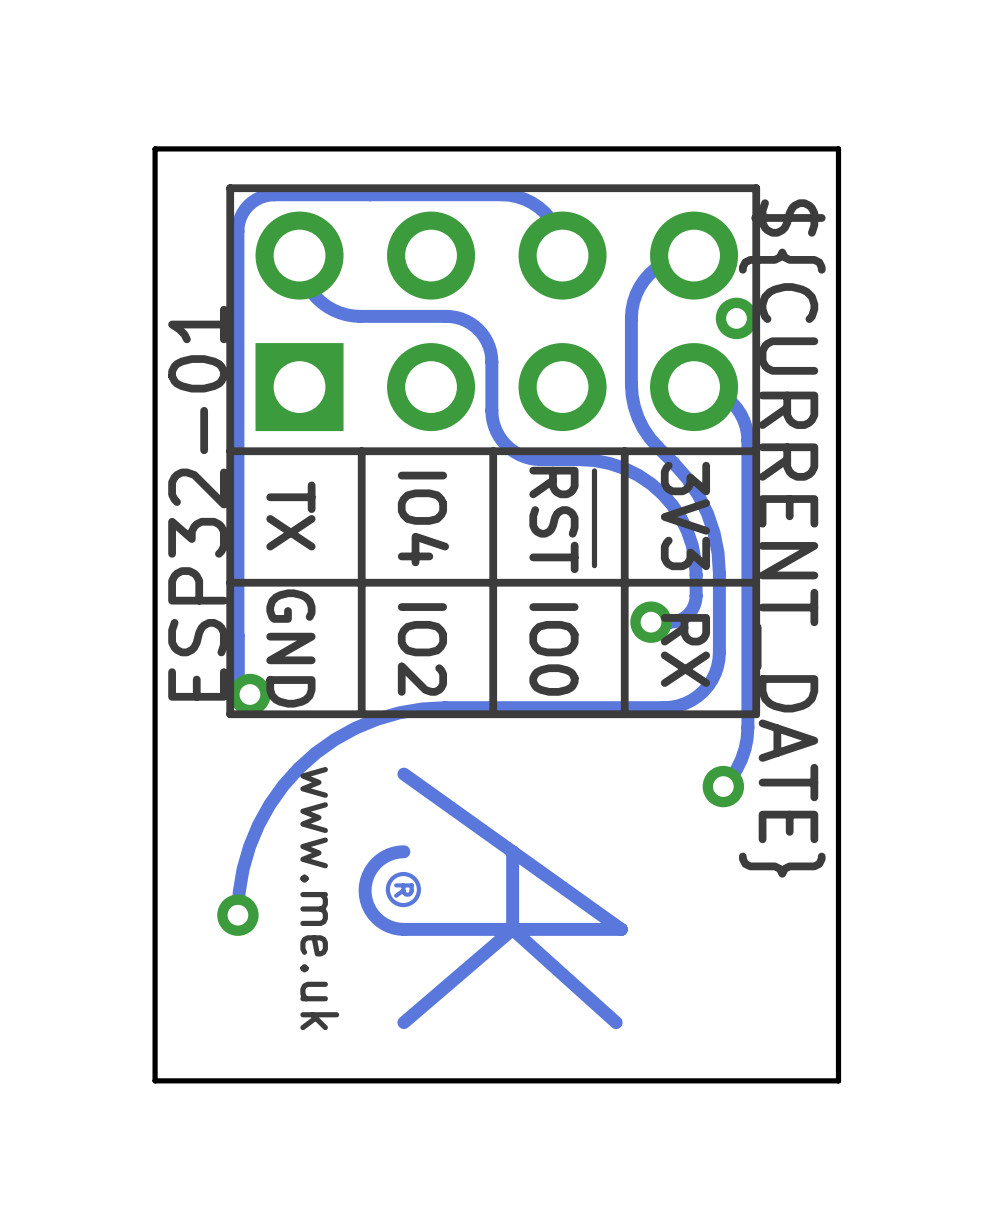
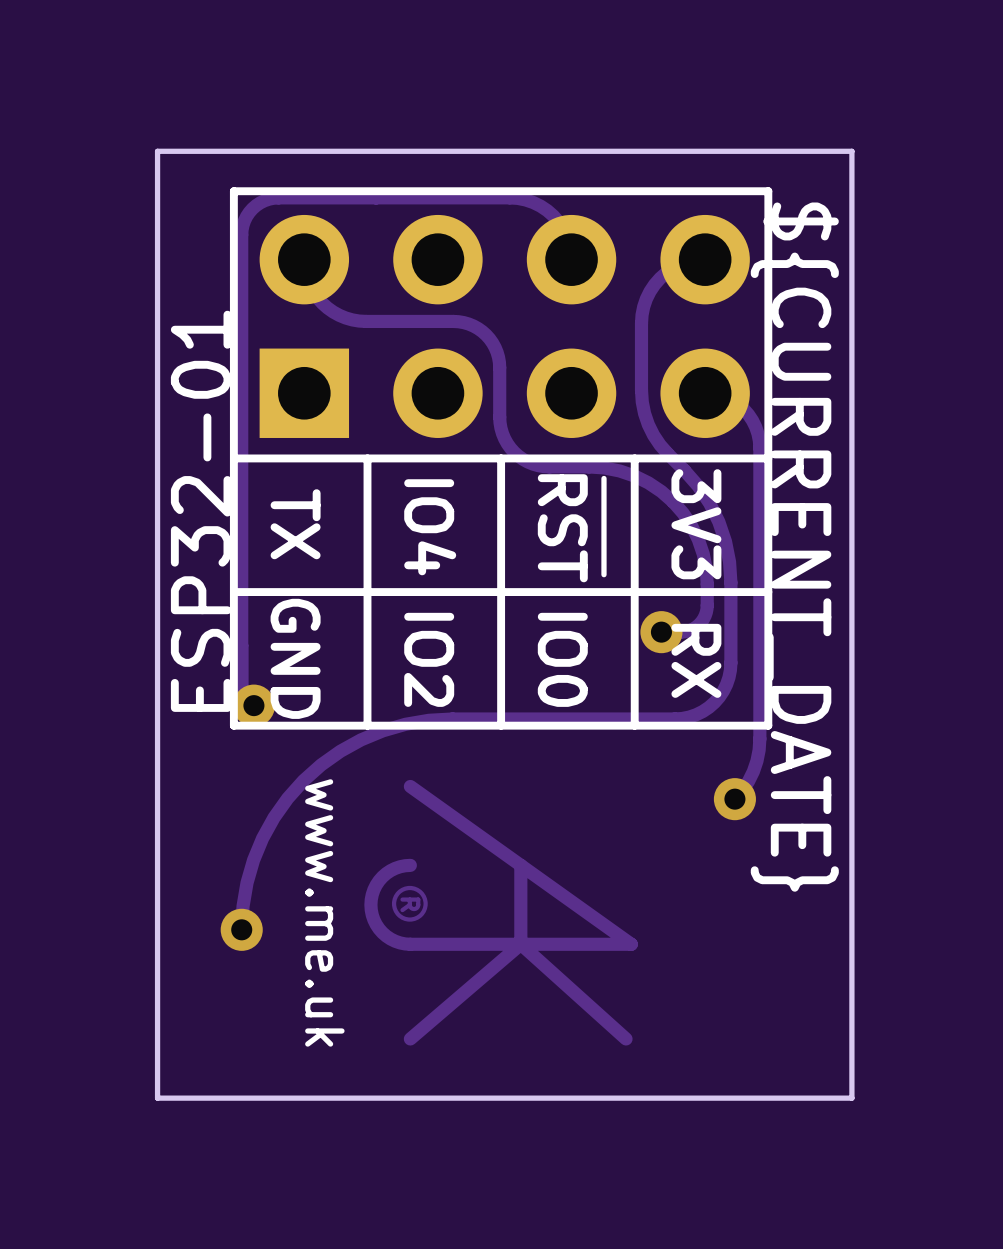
via: (736, 318) -> none

